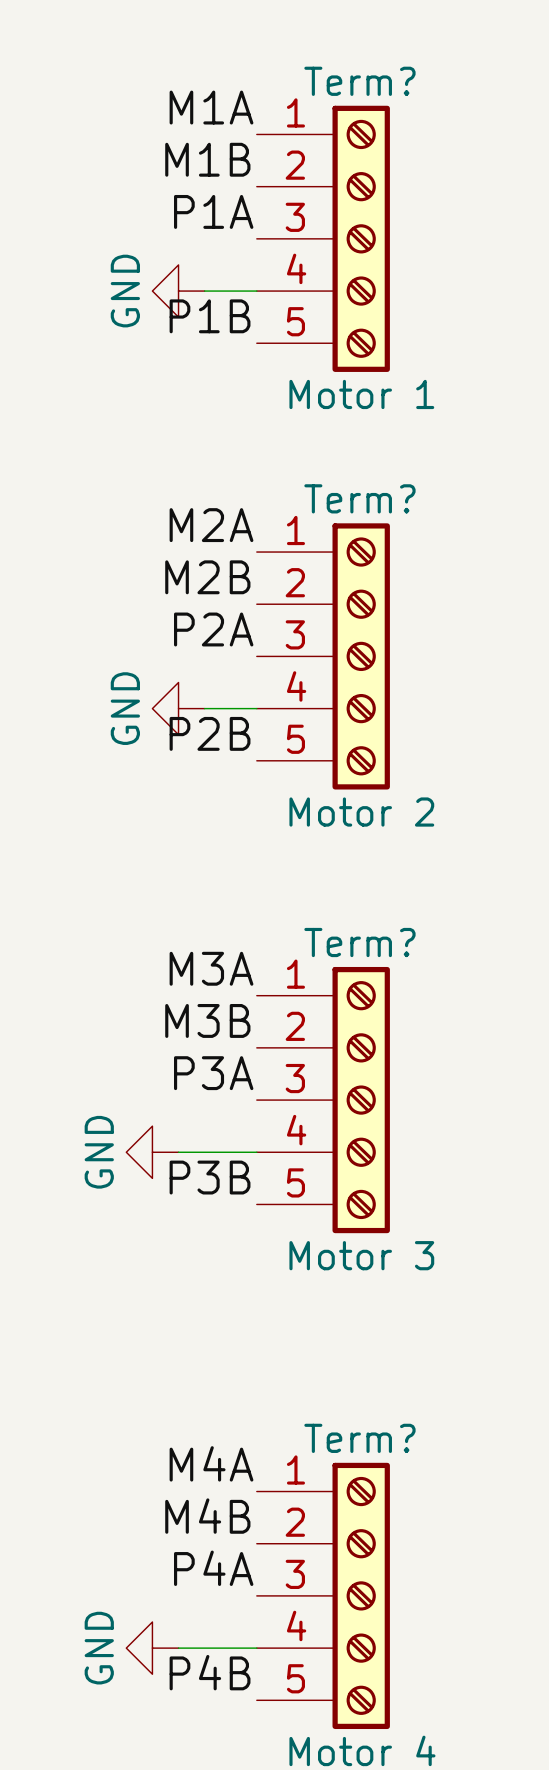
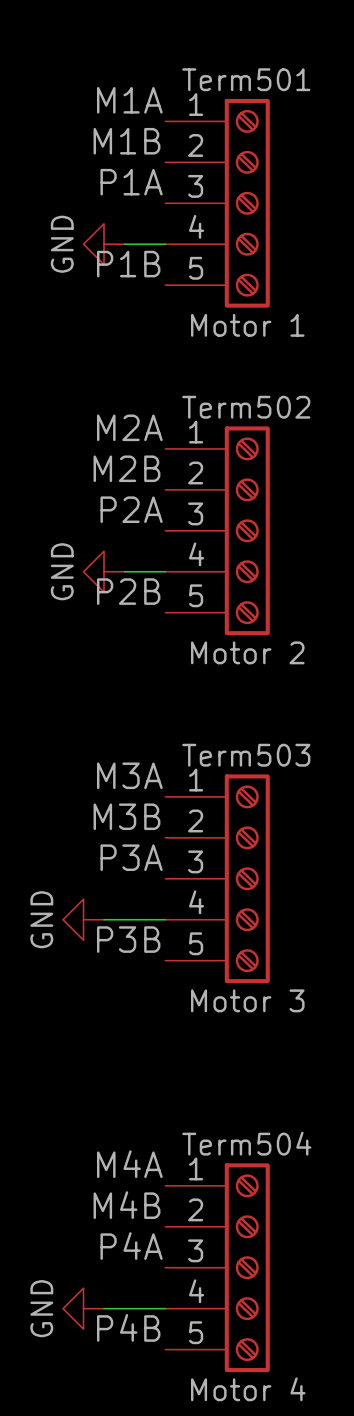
Term? name: Term? (359, 81) -> Term501 (246, 79)
Term? name: Term? (359, 498) -> Term502 (246, 407)
Term? name: Term? (359, 942) -> Term503 (246, 755)
Term? name: Term? (359, 1438) -> Term504 (246, 1143)

